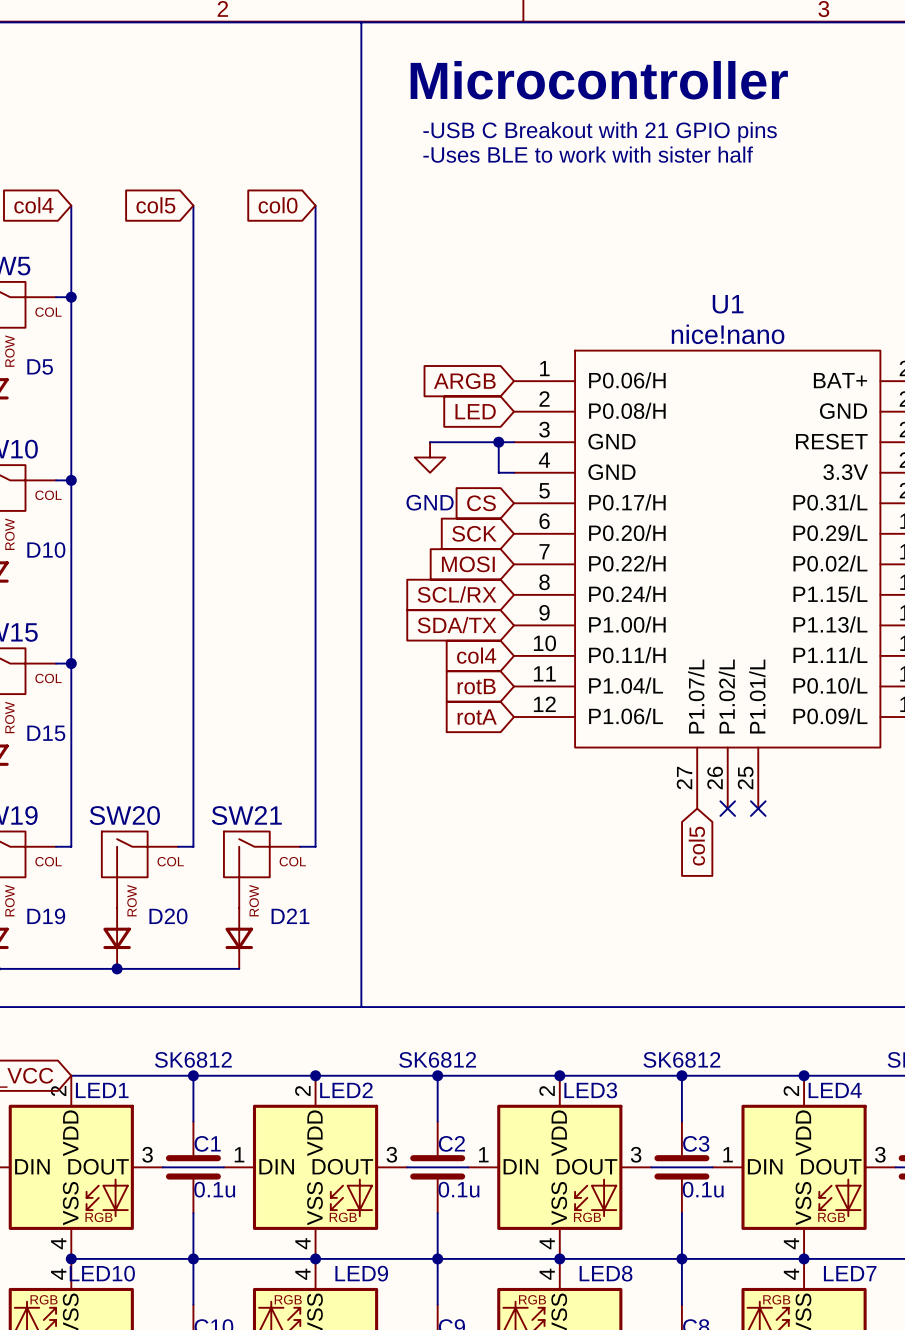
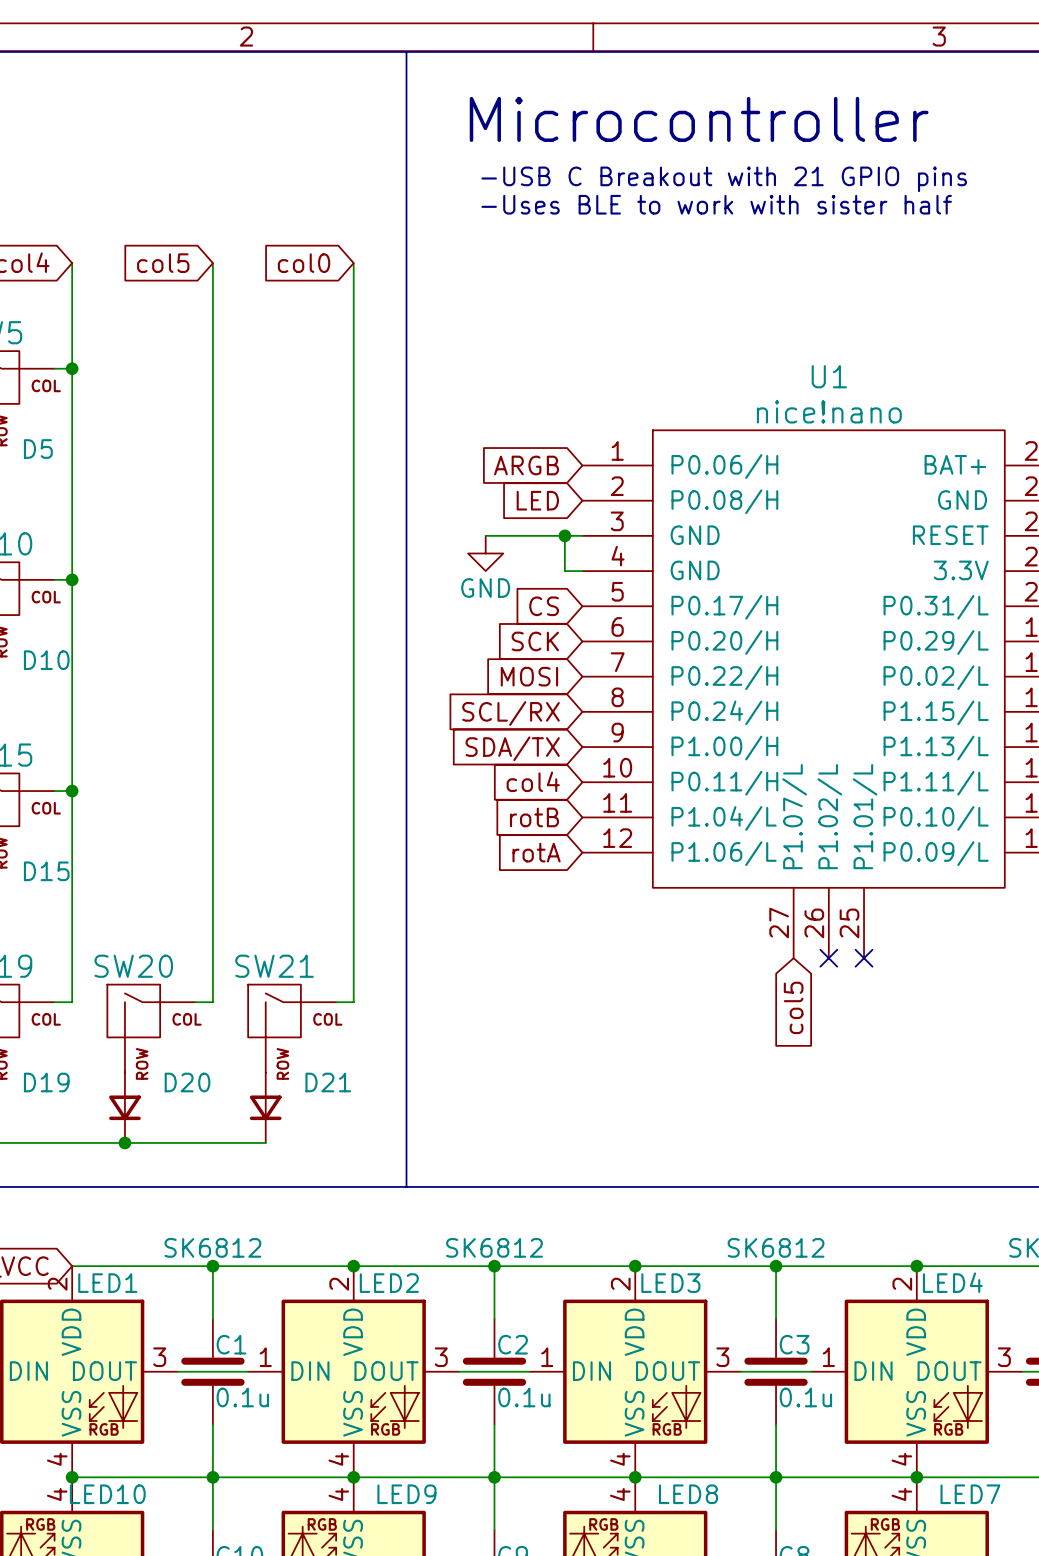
power symbol text position: GND (430, 502) -> GND (485, 588)

